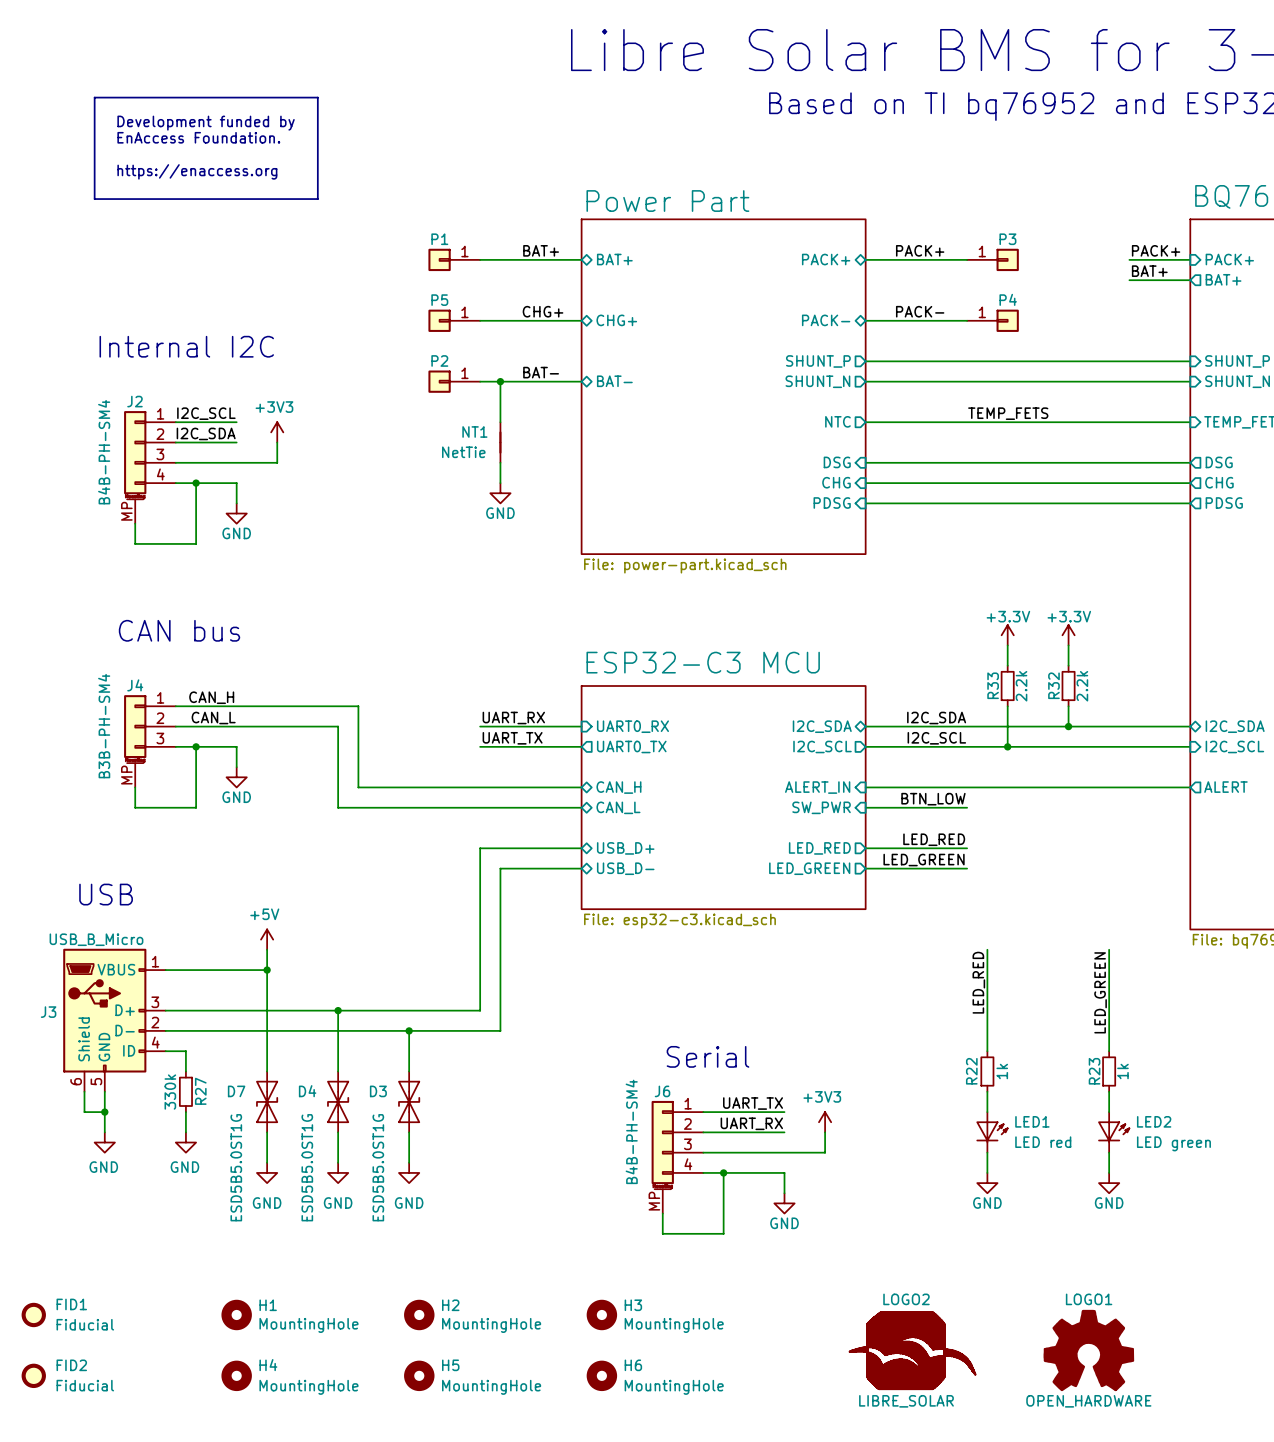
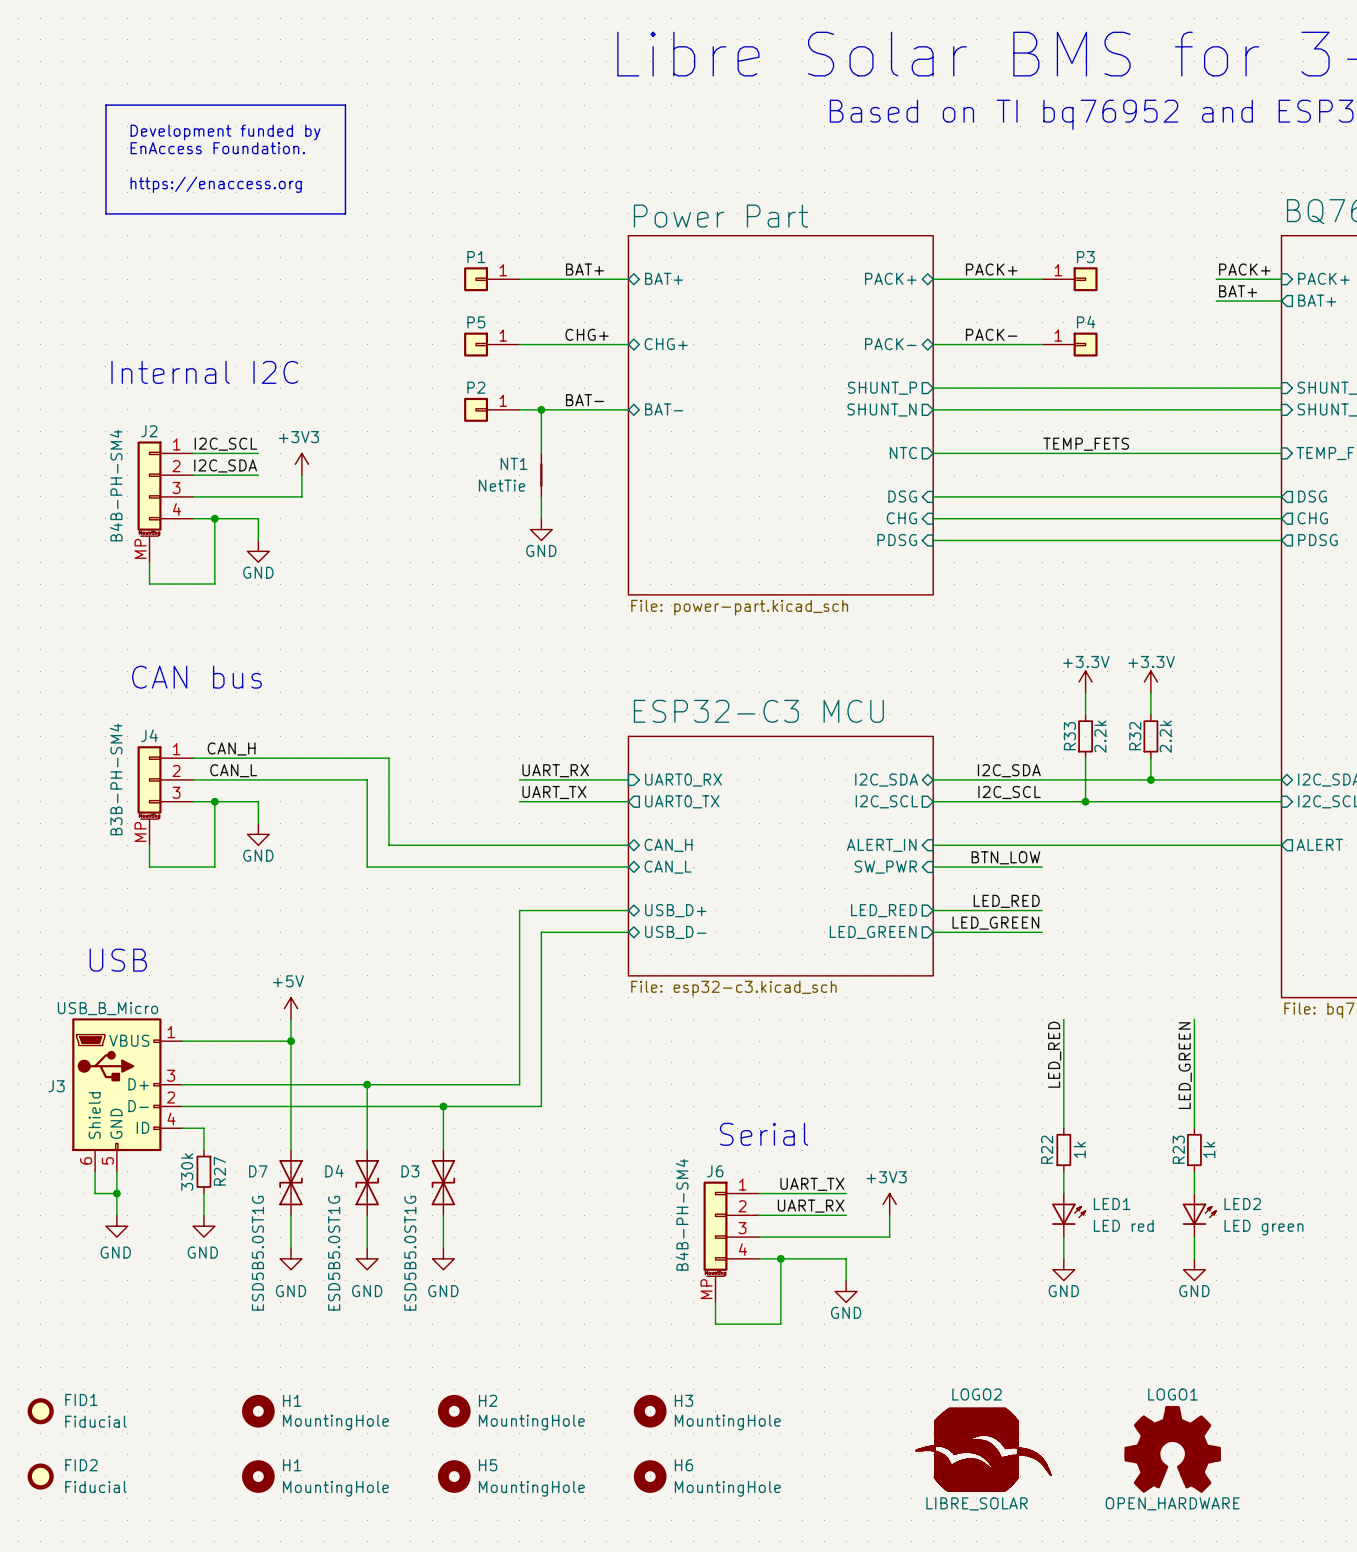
H4 name: H4 (268, 1365) -> H1 (292, 1465)

